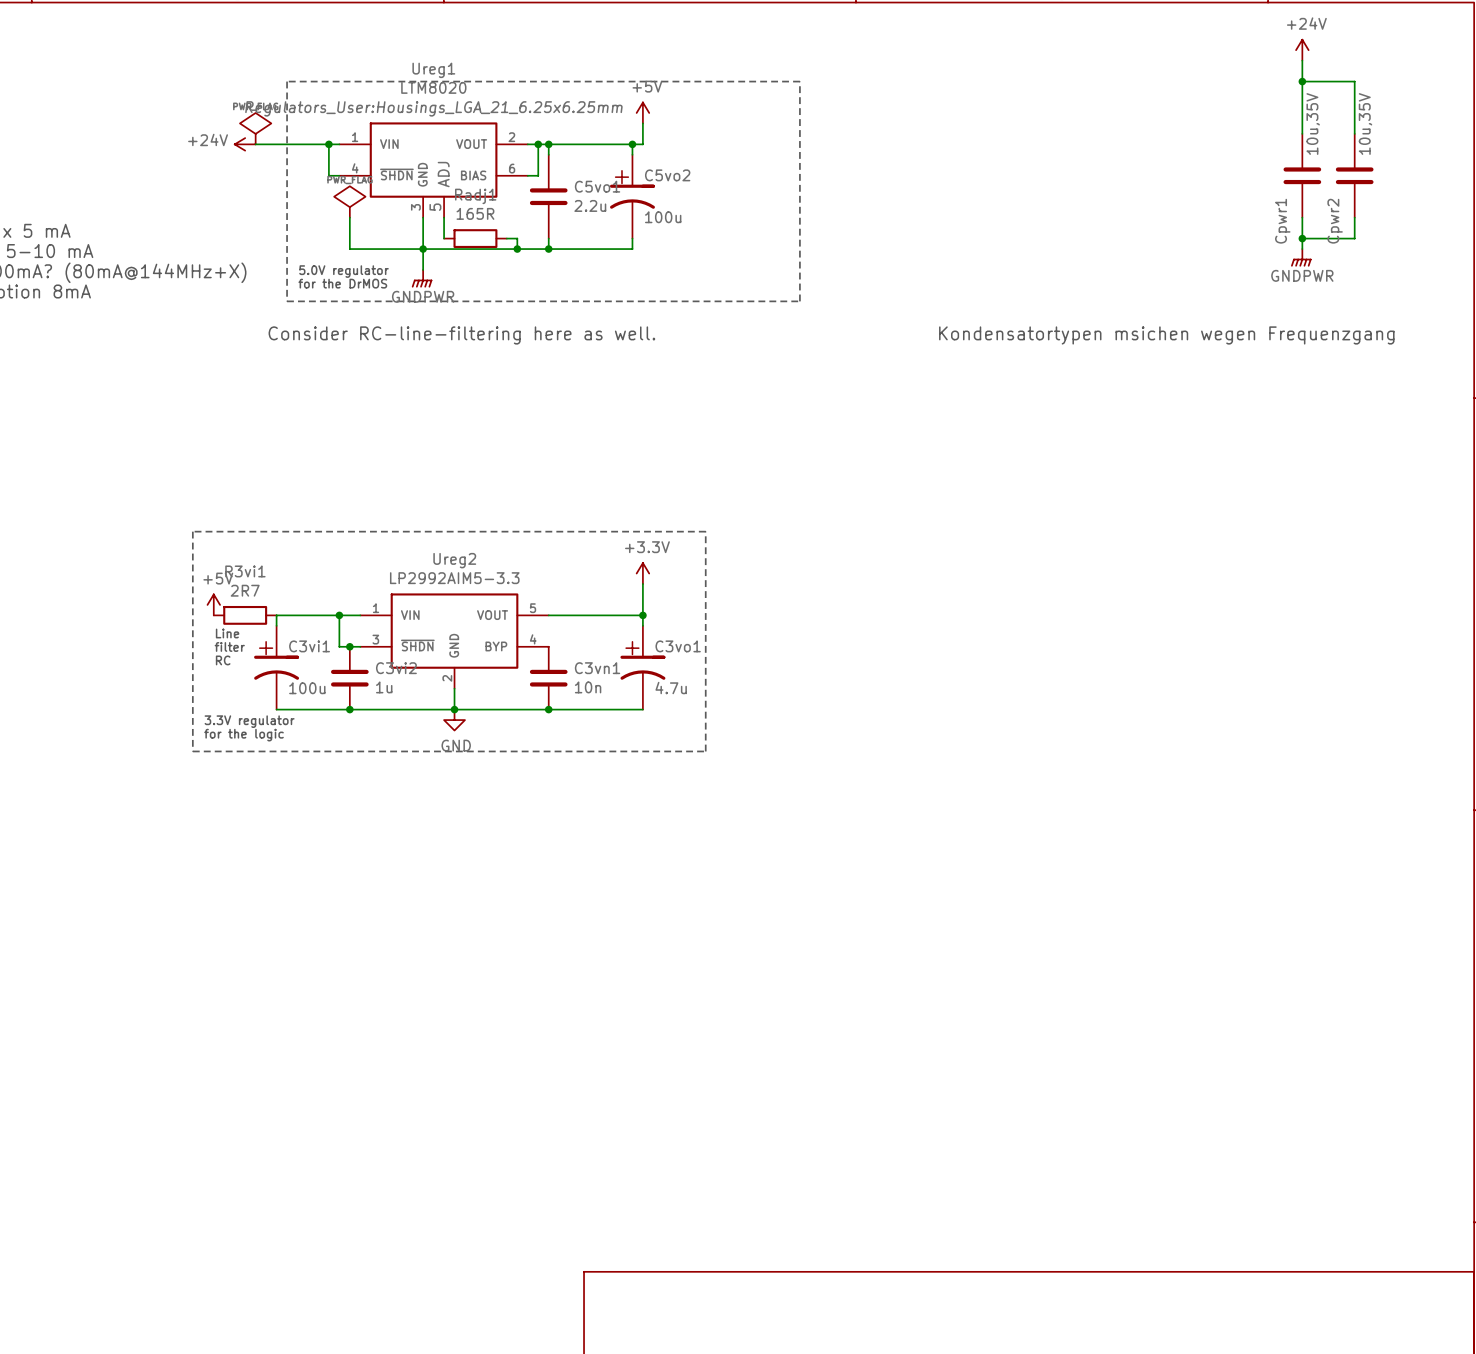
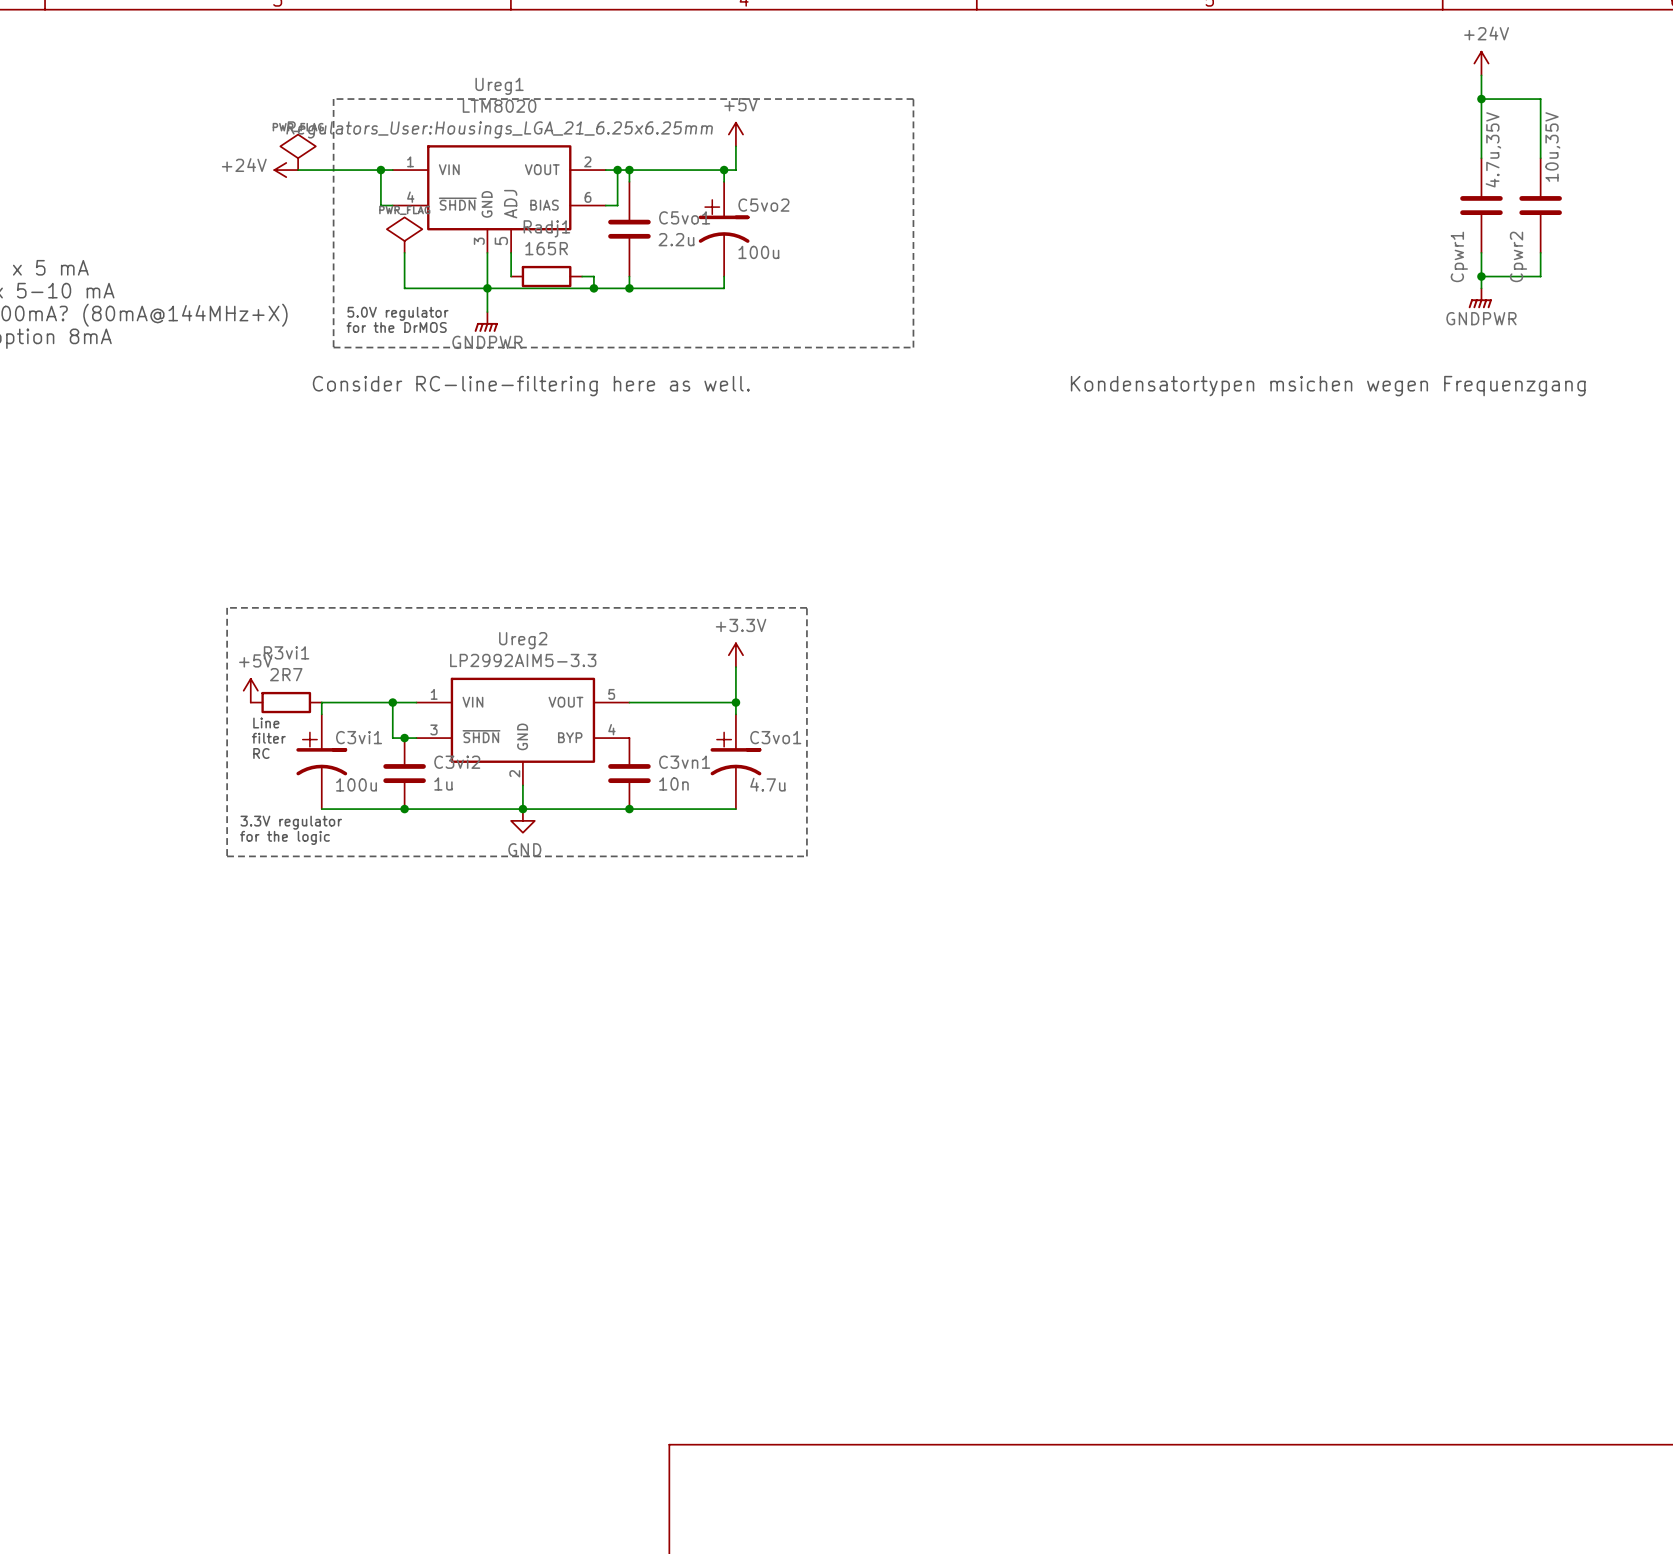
Cpwr1 value: 10u,35V (1313, 124) -> 4.7u,35V (1493, 149)

